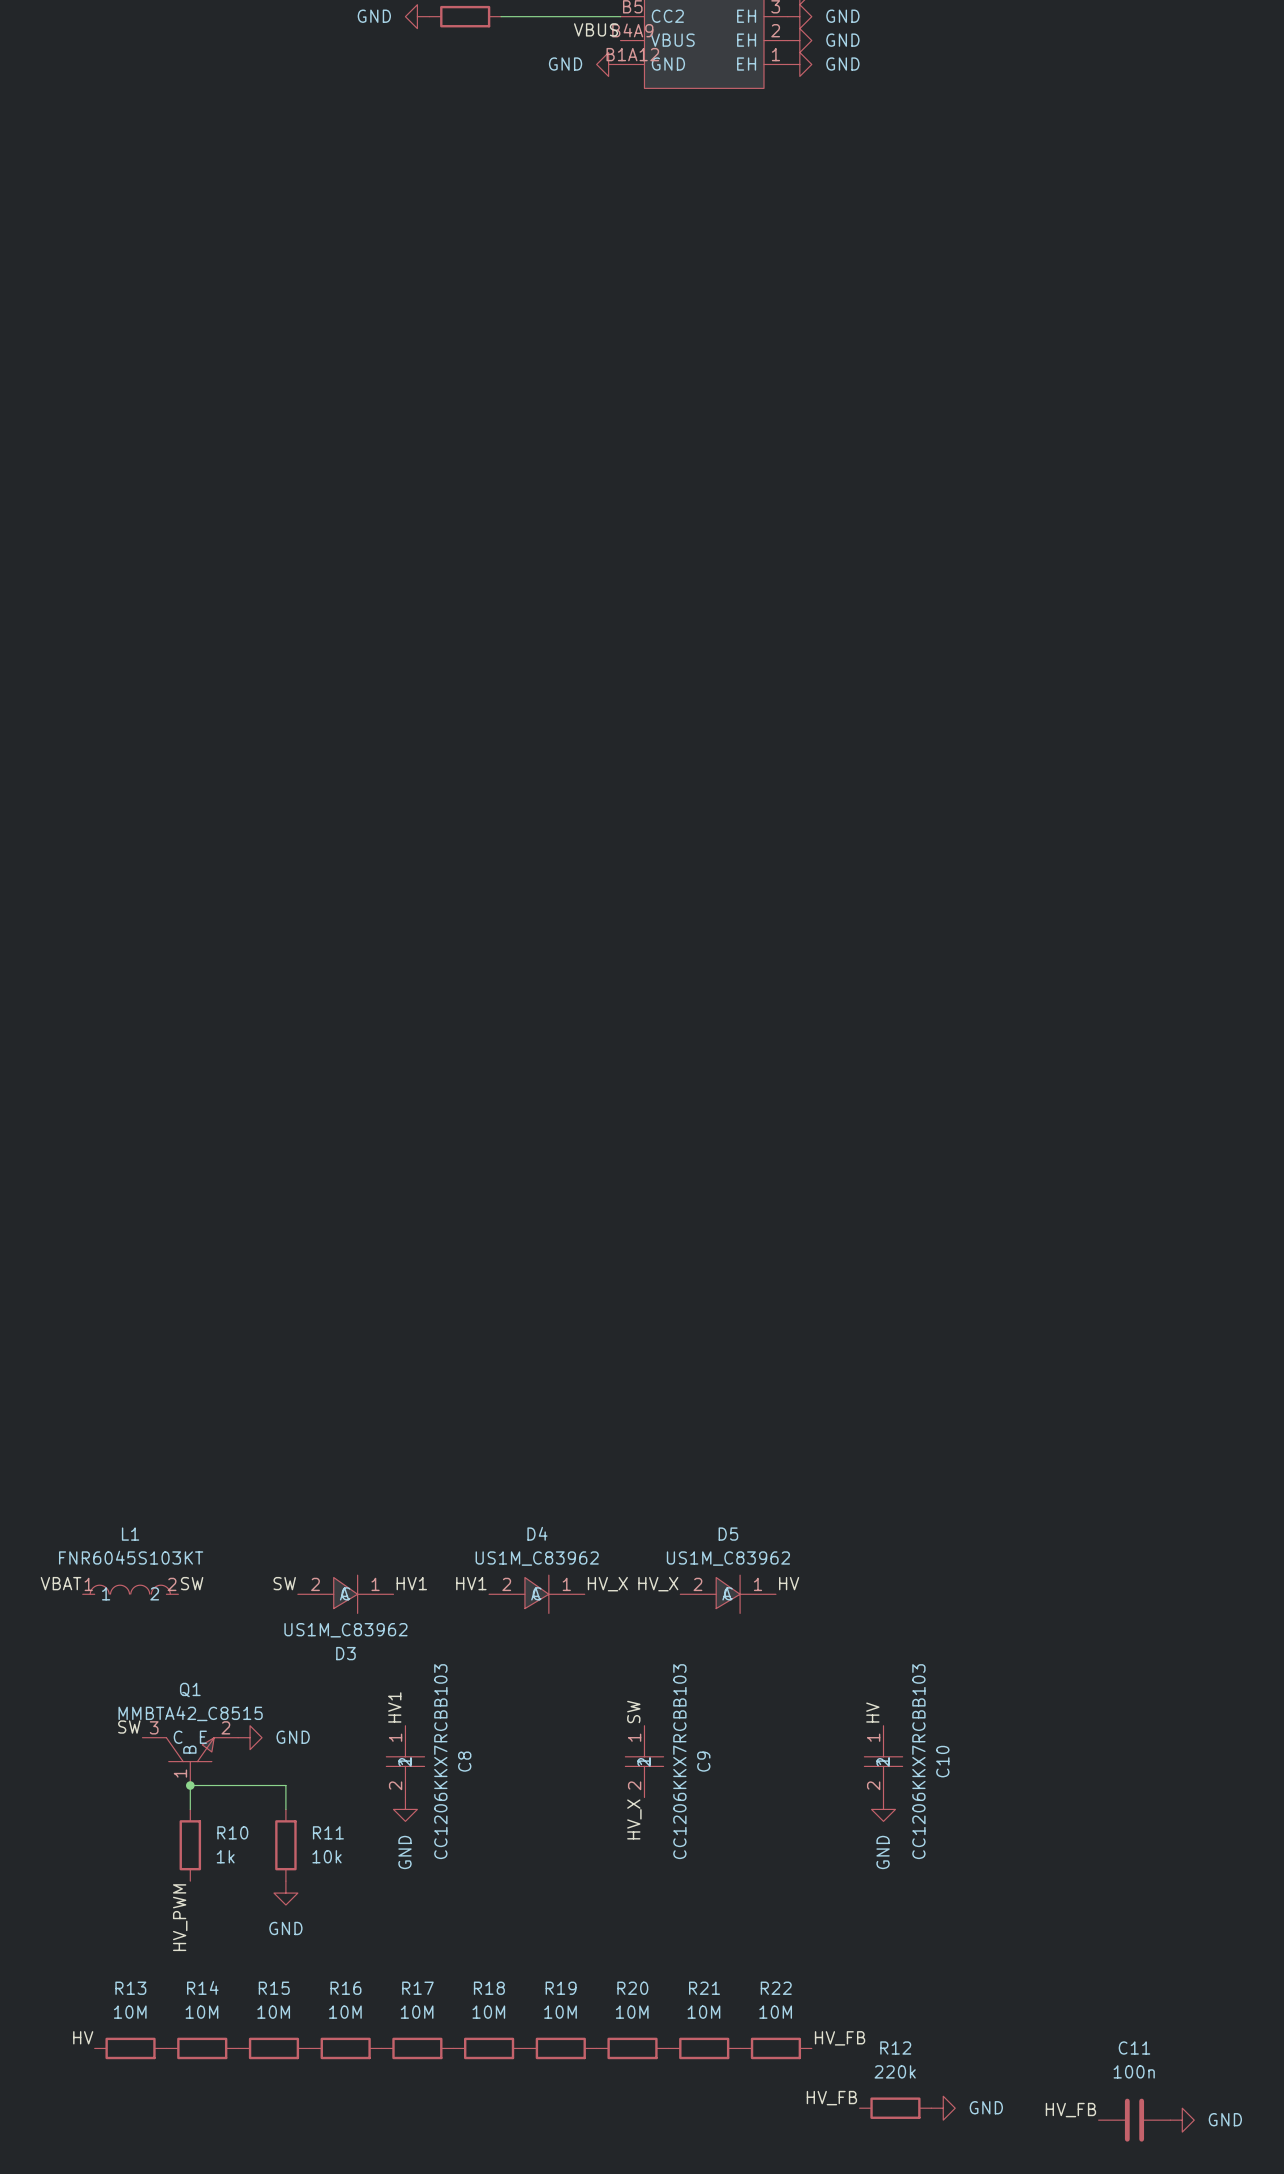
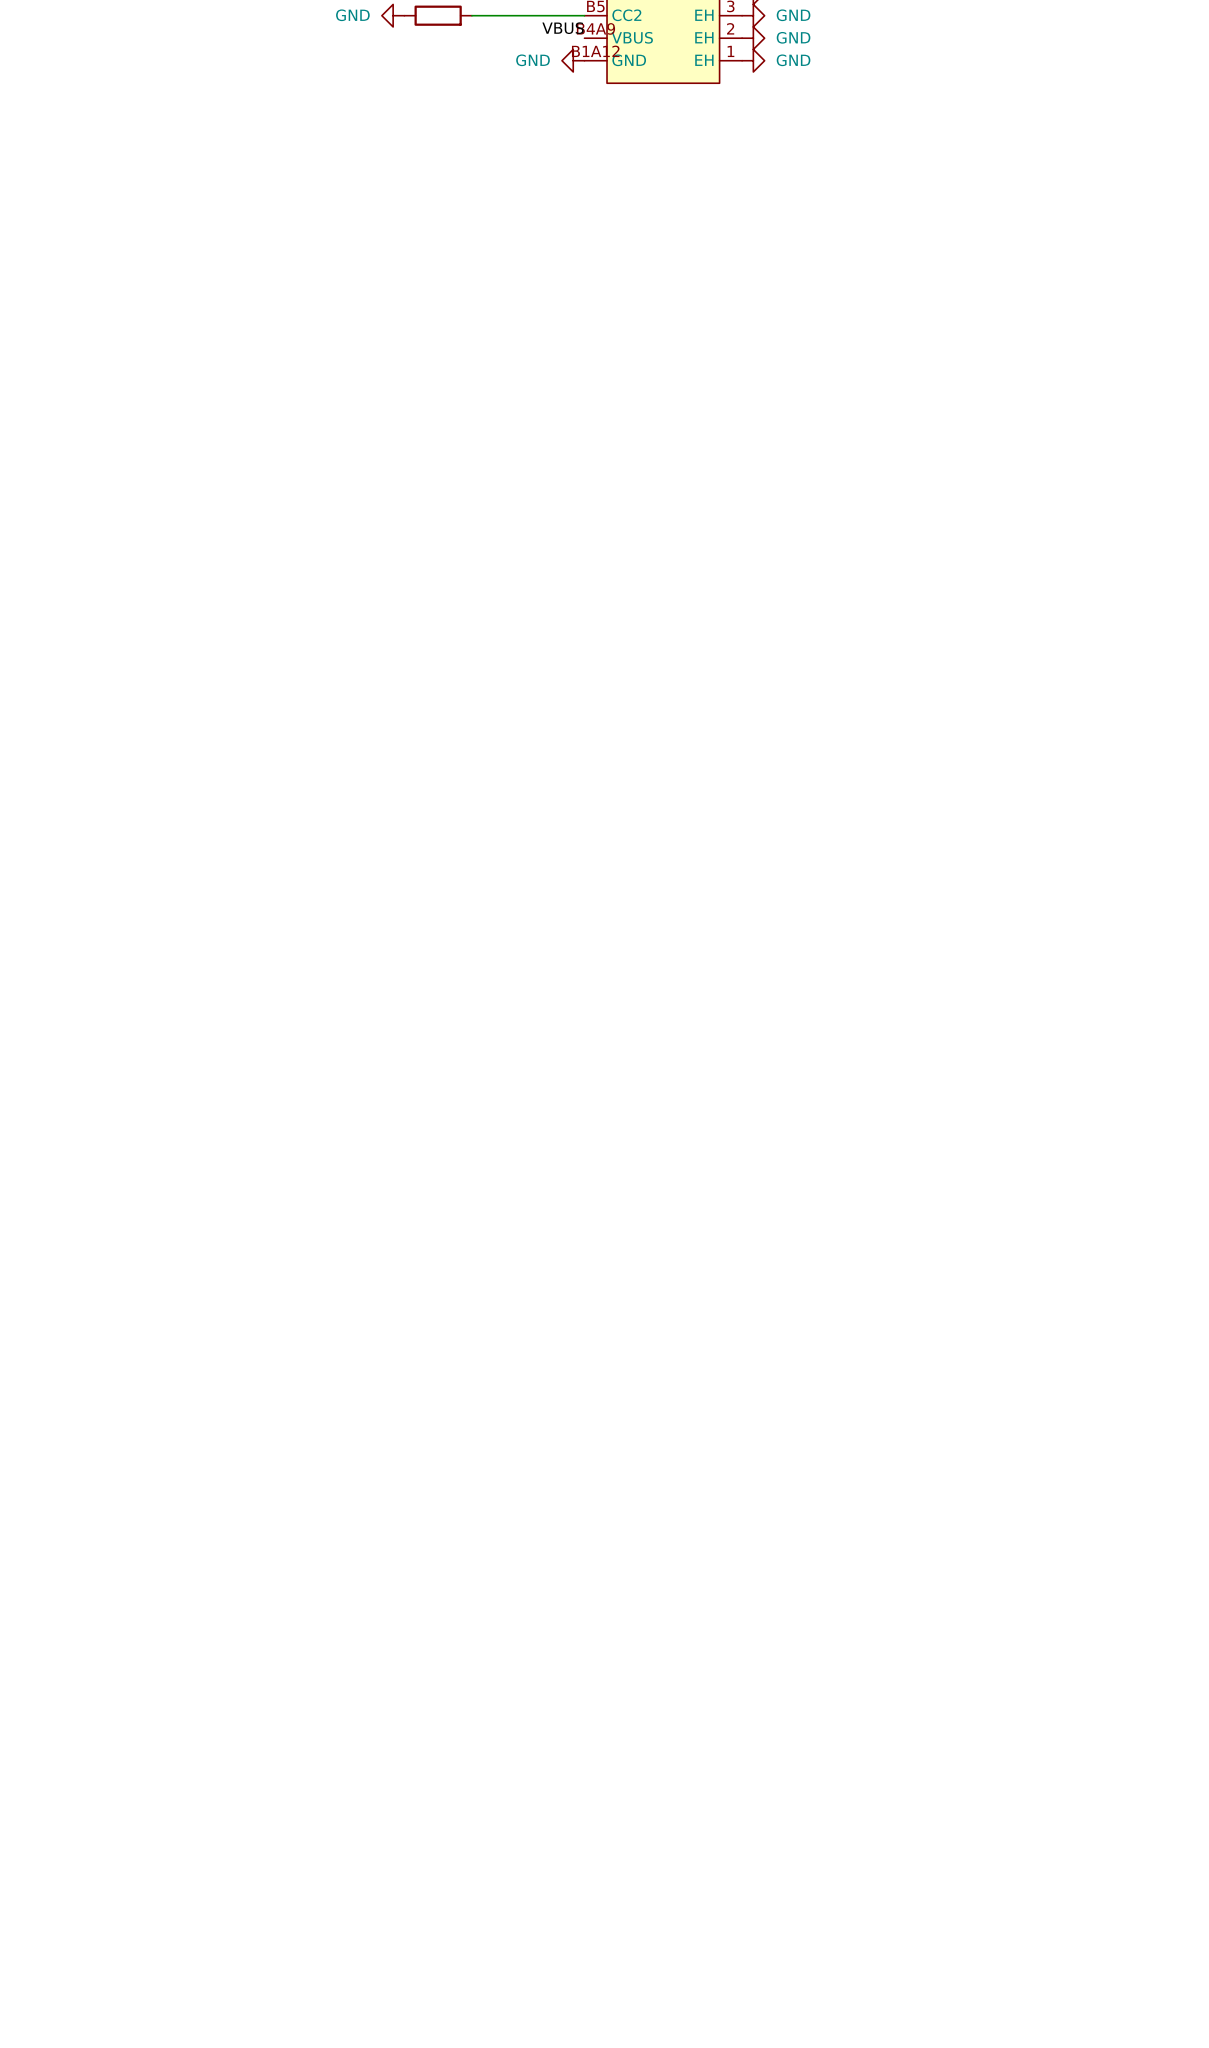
label: VBAT (61, 1583) -> none
label: SW (192, 1583) -> none
label: SW (284, 1583) -> none
label: HV1 (411, 1583) -> none
label: HV1 (471, 1583) -> none
label: HV (789, 1583) -> none
label: HV_X (607, 1584) -> none
label: HV_X (658, 1584) -> none
L1: FNR6045S103KT (130, 1589) -> none
D3: US1M_C83962 (345, 1594) -> none
D4: US1M_C83962 (536, 1594) -> none
D5: US1M_C83962 (728, 1594) -> none
label: HV1 (394, 1707) -> none
label: SW (633, 1712) -> none
label: HV (872, 1712) -> none
label: SW (129, 1727) -> none
power symbol: GND (250, 1737) -> none
Q1: MMBTA42_C8515 (190, 1761) -> none
C8: CC1206KKX7RCBB103 (405, 1761) -> none
C9: CC1206KKX7RCBB103 (644, 1761) -> none
C10: CC1206KKX7RCBB103 (883, 1761) -> none
junction: (190, 1785) -> none
wire: (190, 1809) (190, 1785) (285, 1785) (285, 1809) -> none
power symbol: GND (405, 1809) -> none
power symbol: GND (883, 1809) -> none
label: HV_X (634, 1819) -> none
R10: 1k (190, 1845) -> none
R11: 10k (285, 1845) -> none
power symbol: GND (285, 1893) -> none
label: HV_PWM (180, 1917) -> none
label: HV (83, 2037) -> none
label: HV_FB (840, 2038) -> none
R13: 10M (130, 2048) -> none
R14: 10M (202, 2048) -> none
R15: 10M (273, 2048) -> none
R16: 10M (345, 2048) -> none
R17: 10M (417, 2048) -> none
R18: 10M (489, 2048) -> none
R19: 10M (560, 2048) -> none
R20: 10M (632, 2048) -> none
R21: 10M (704, 2048) -> none
R22: 10M (775, 2048) -> none
label: HV_FB (831, 2098) -> none
R12: 220k (895, 2108) -> none
power symbol: GND (943, 2108) -> none
label: HV_FB (1070, 2110) -> none
C11: 100n (1134, 2120) -> none
power symbol: GND (1182, 2120) -> none

